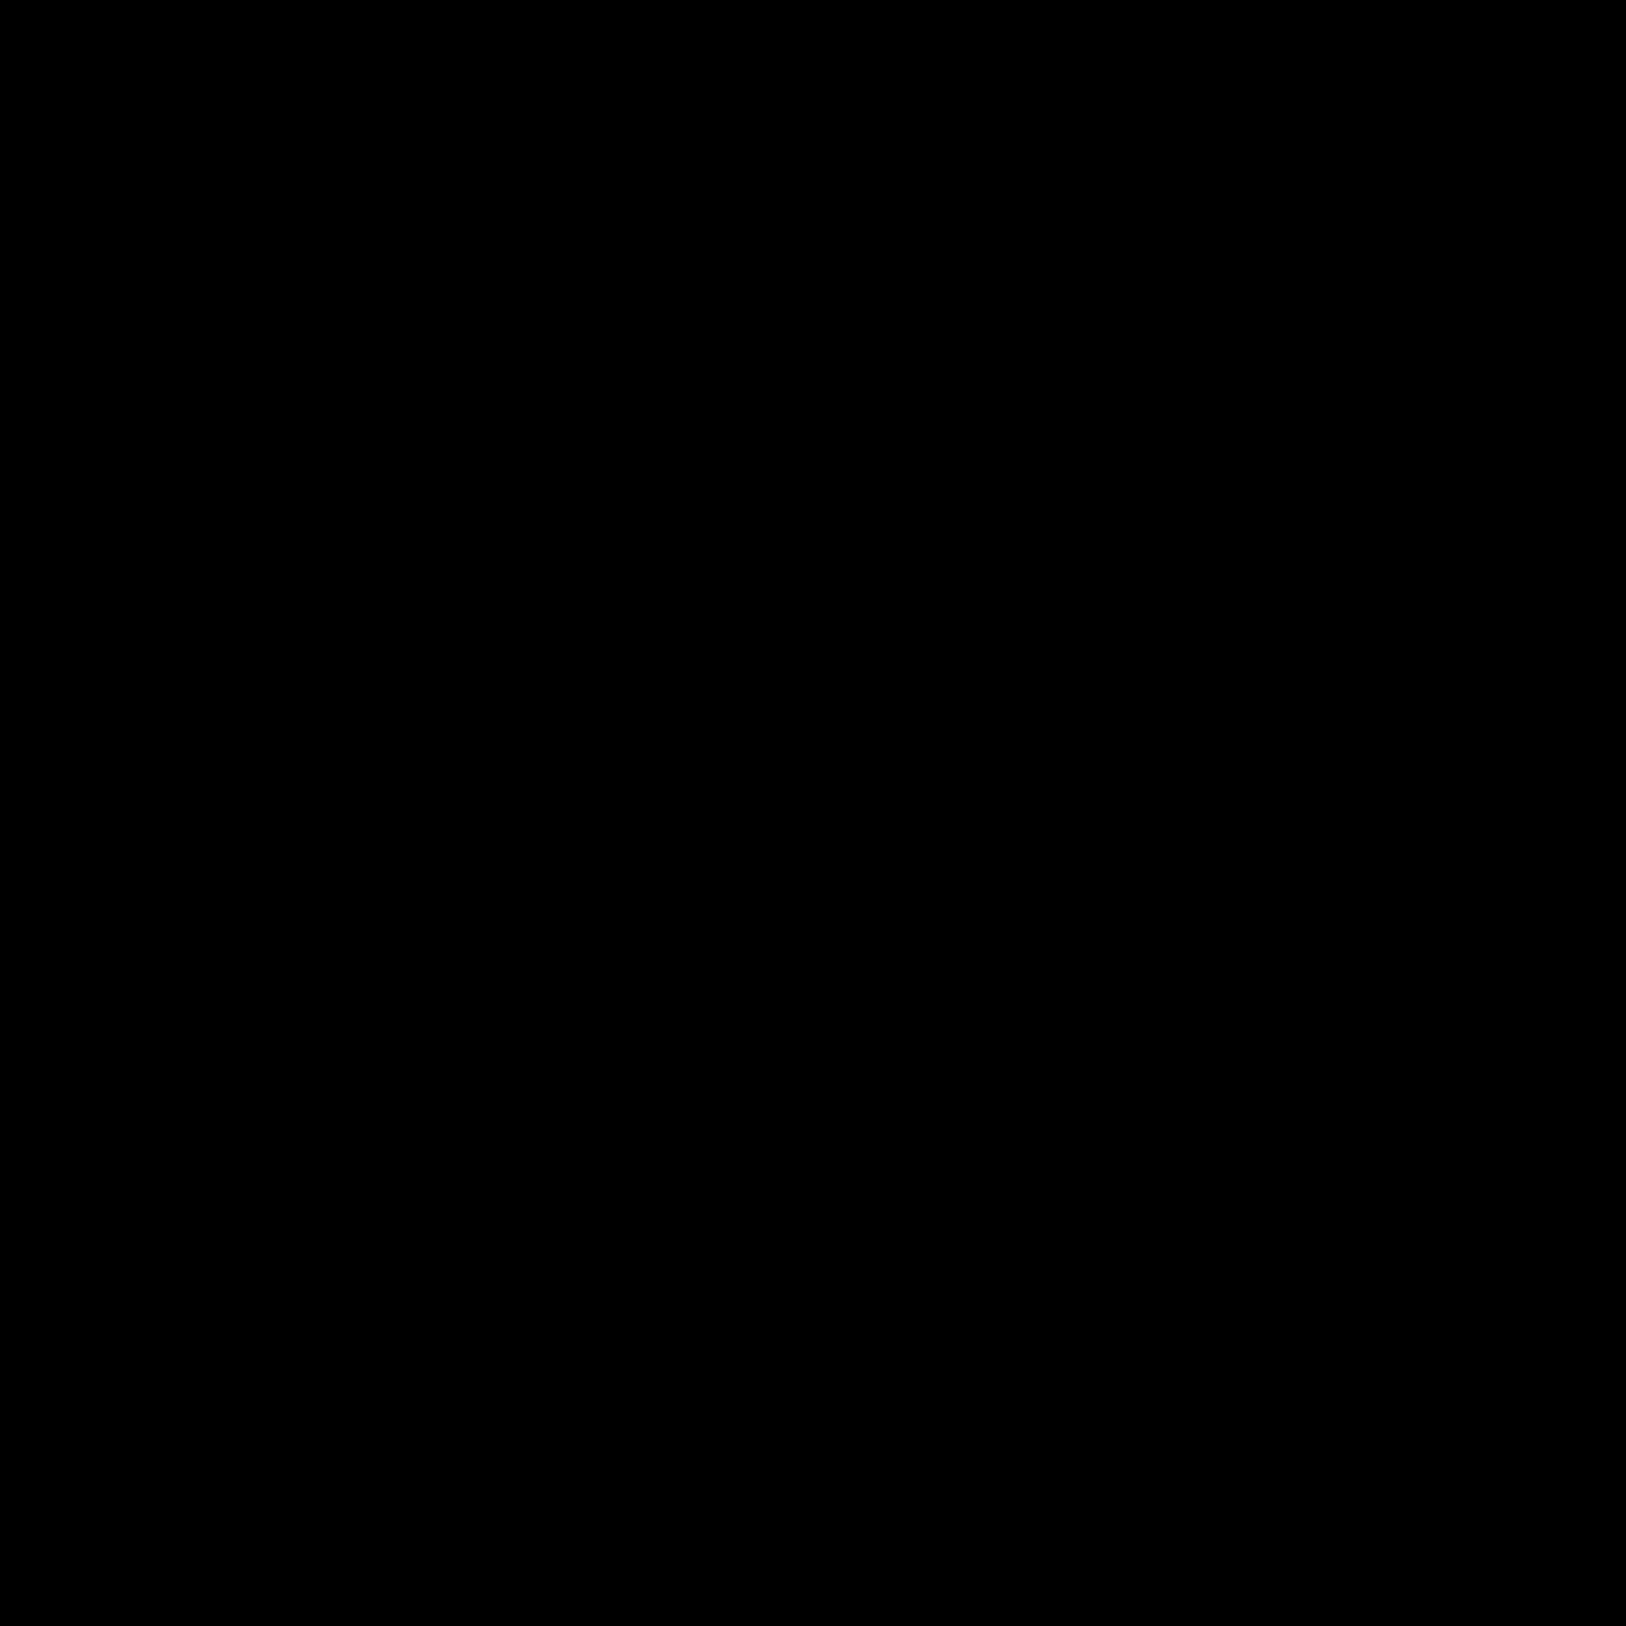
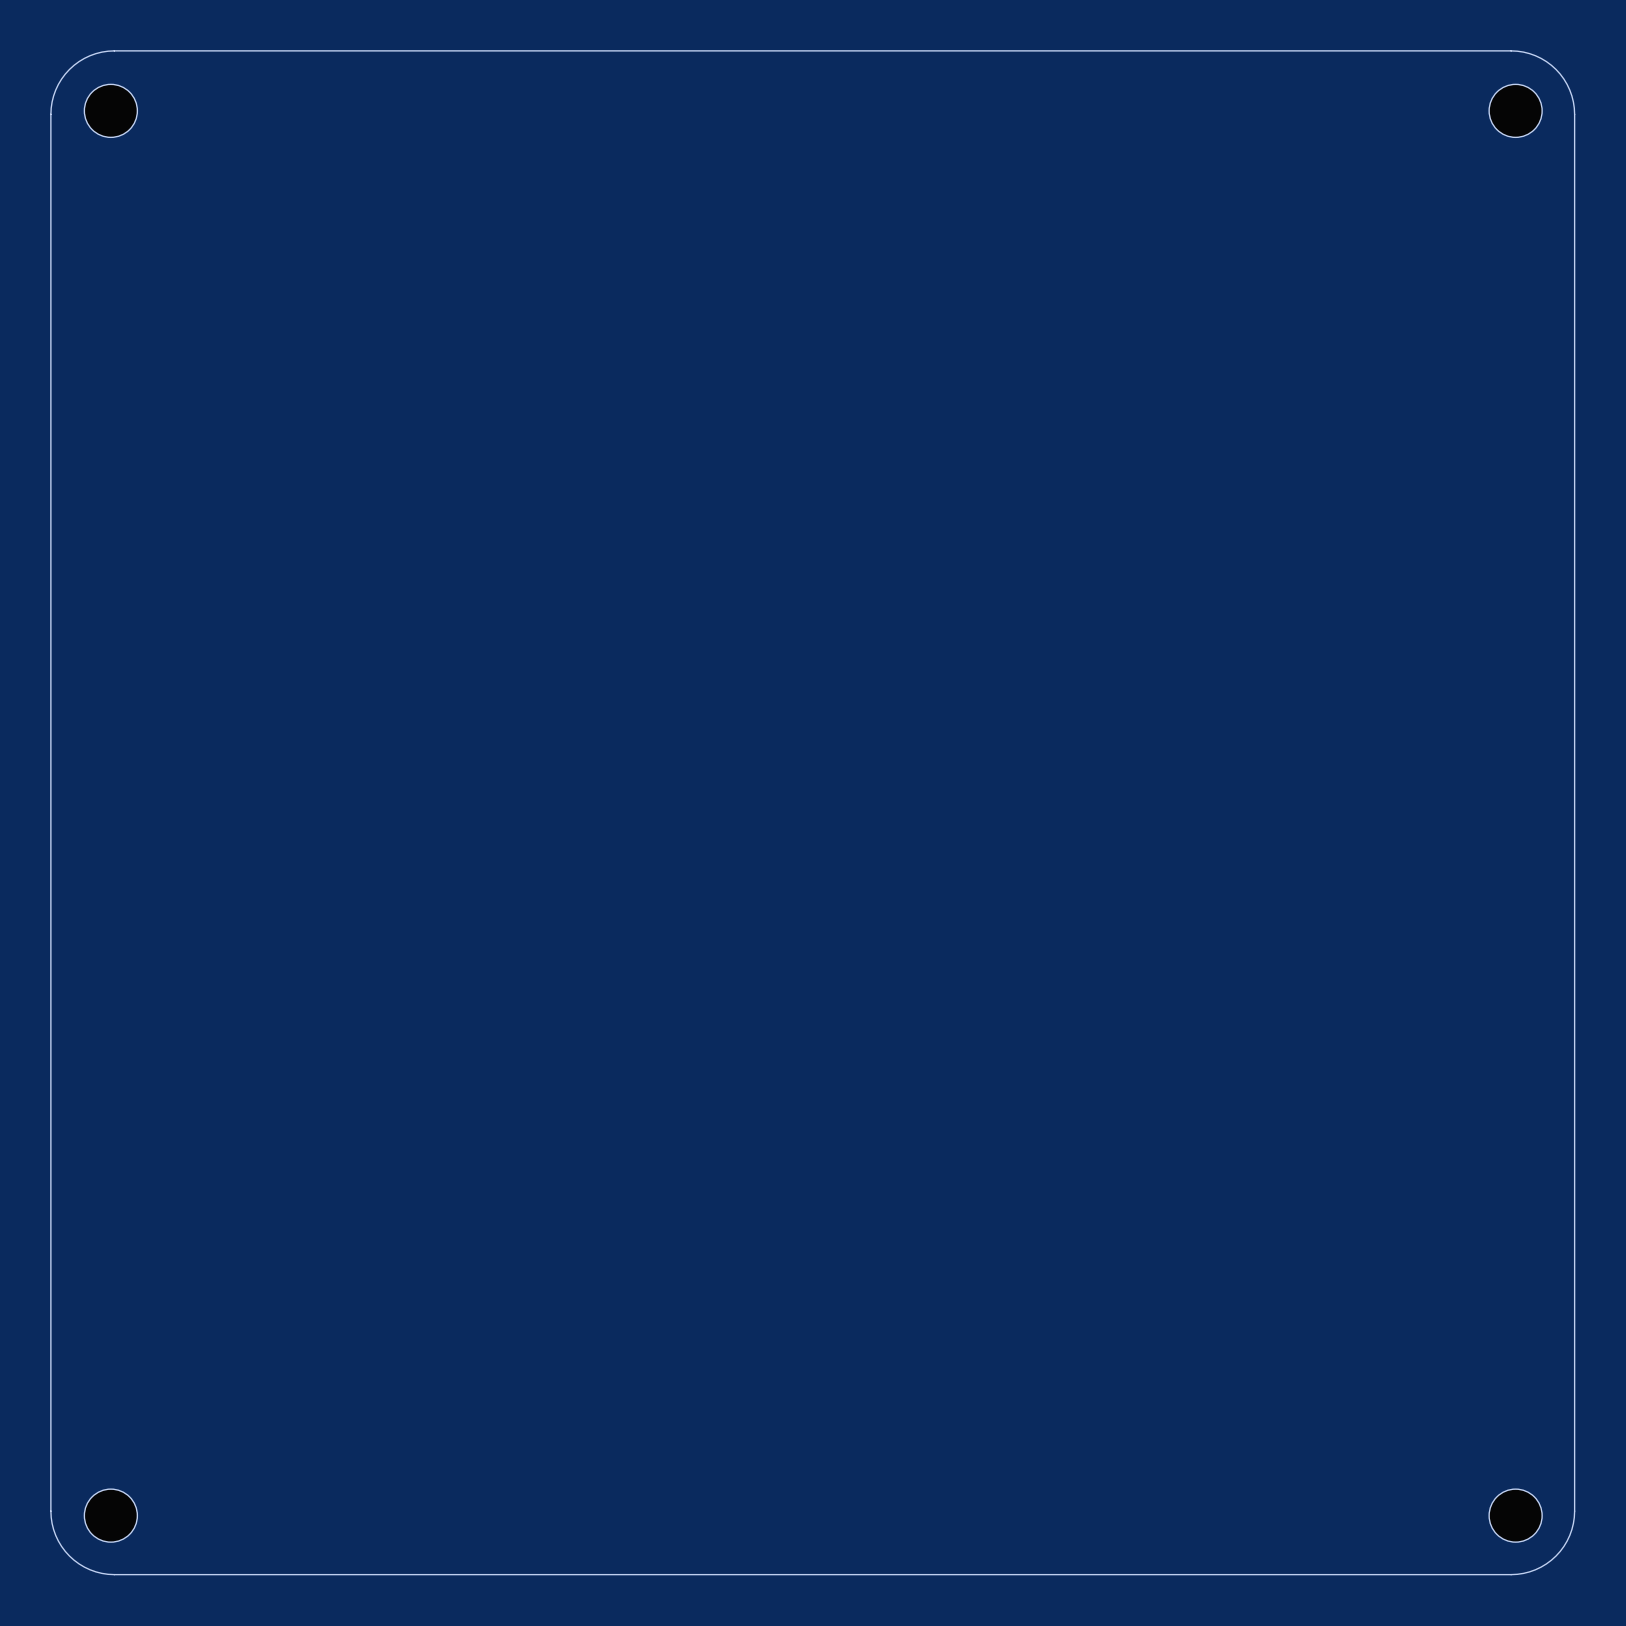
board edge: none -> (1511, 50) (114, 50) (90, 55) (69, 69) (55, 90) (50, 114) (50, 1511) (55, 1535) (69, 1556) (90, 1569) (114, 1574) (1511, 1574) (1535, 1569) (1556, 1556) (1569, 1535) (1574, 1511) (1574, 114) (1569, 90) (1556, 69) (1535, 55) (1511, 50)
part: none -> (110, 110)
part: none -> (1515, 110)
part: none -> (110, 1515)
part: none -> (1515, 1515)

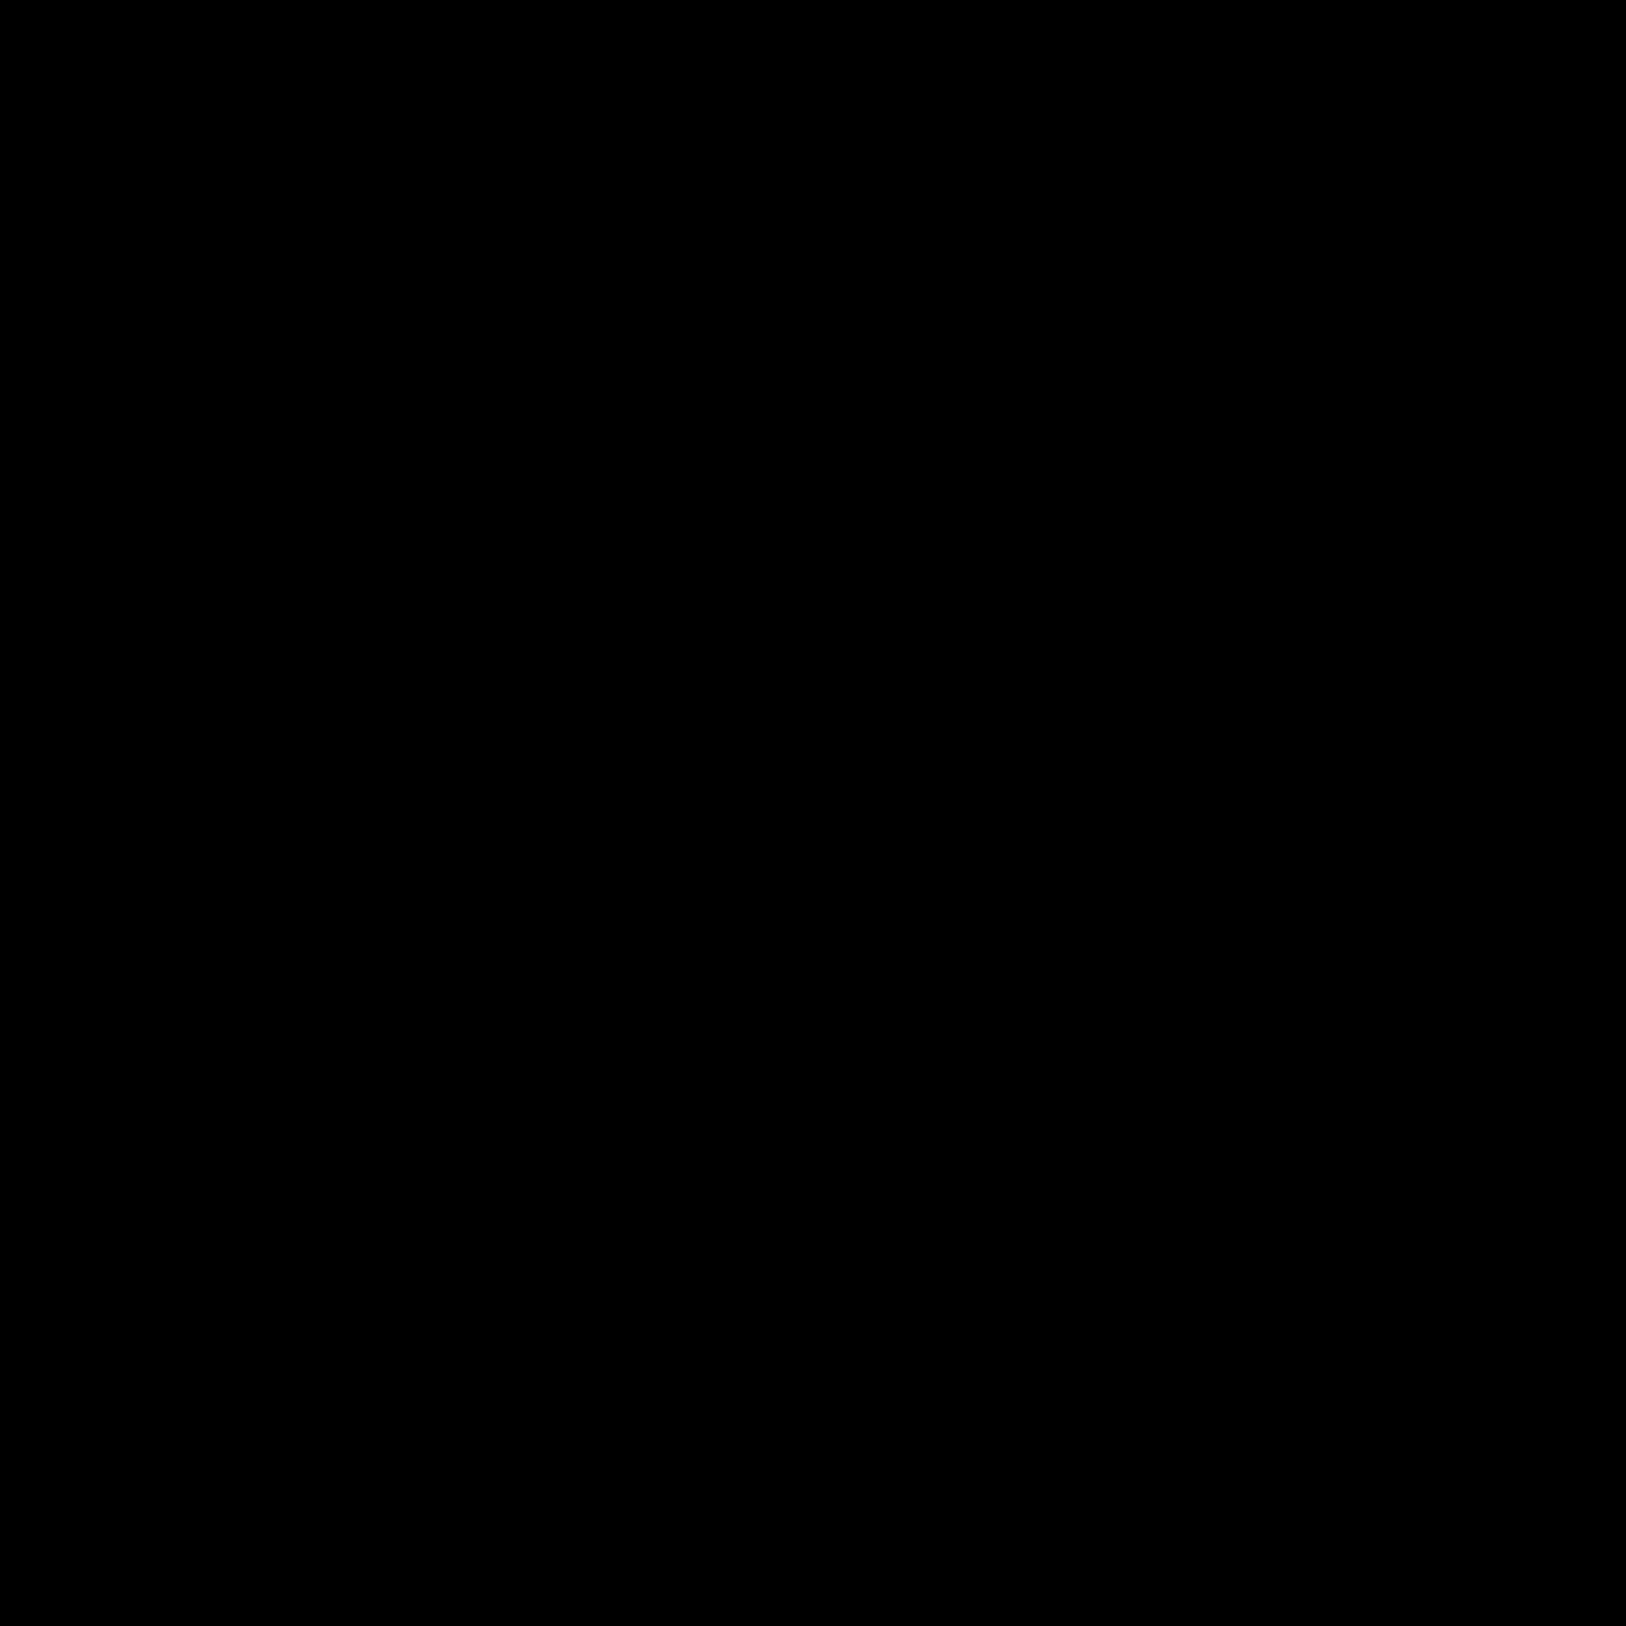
board edge: (1511, 50) (114, 50) (90, 55) (69, 69) (55, 90) (50, 114) (50, 1511) (55, 1535) (69, 1556) (90, 1569) (114, 1574) (1511, 1574) (1535, 1569) (1556, 1556) (1569, 1535) (1574, 1511) (1574, 114) (1569, 90) (1556, 69) (1535, 55) (1511, 50) -> none
part: (110, 110) -> none
part: (1515, 110) -> none
part: (110, 1515) -> none
part: (1515, 1515) -> none

